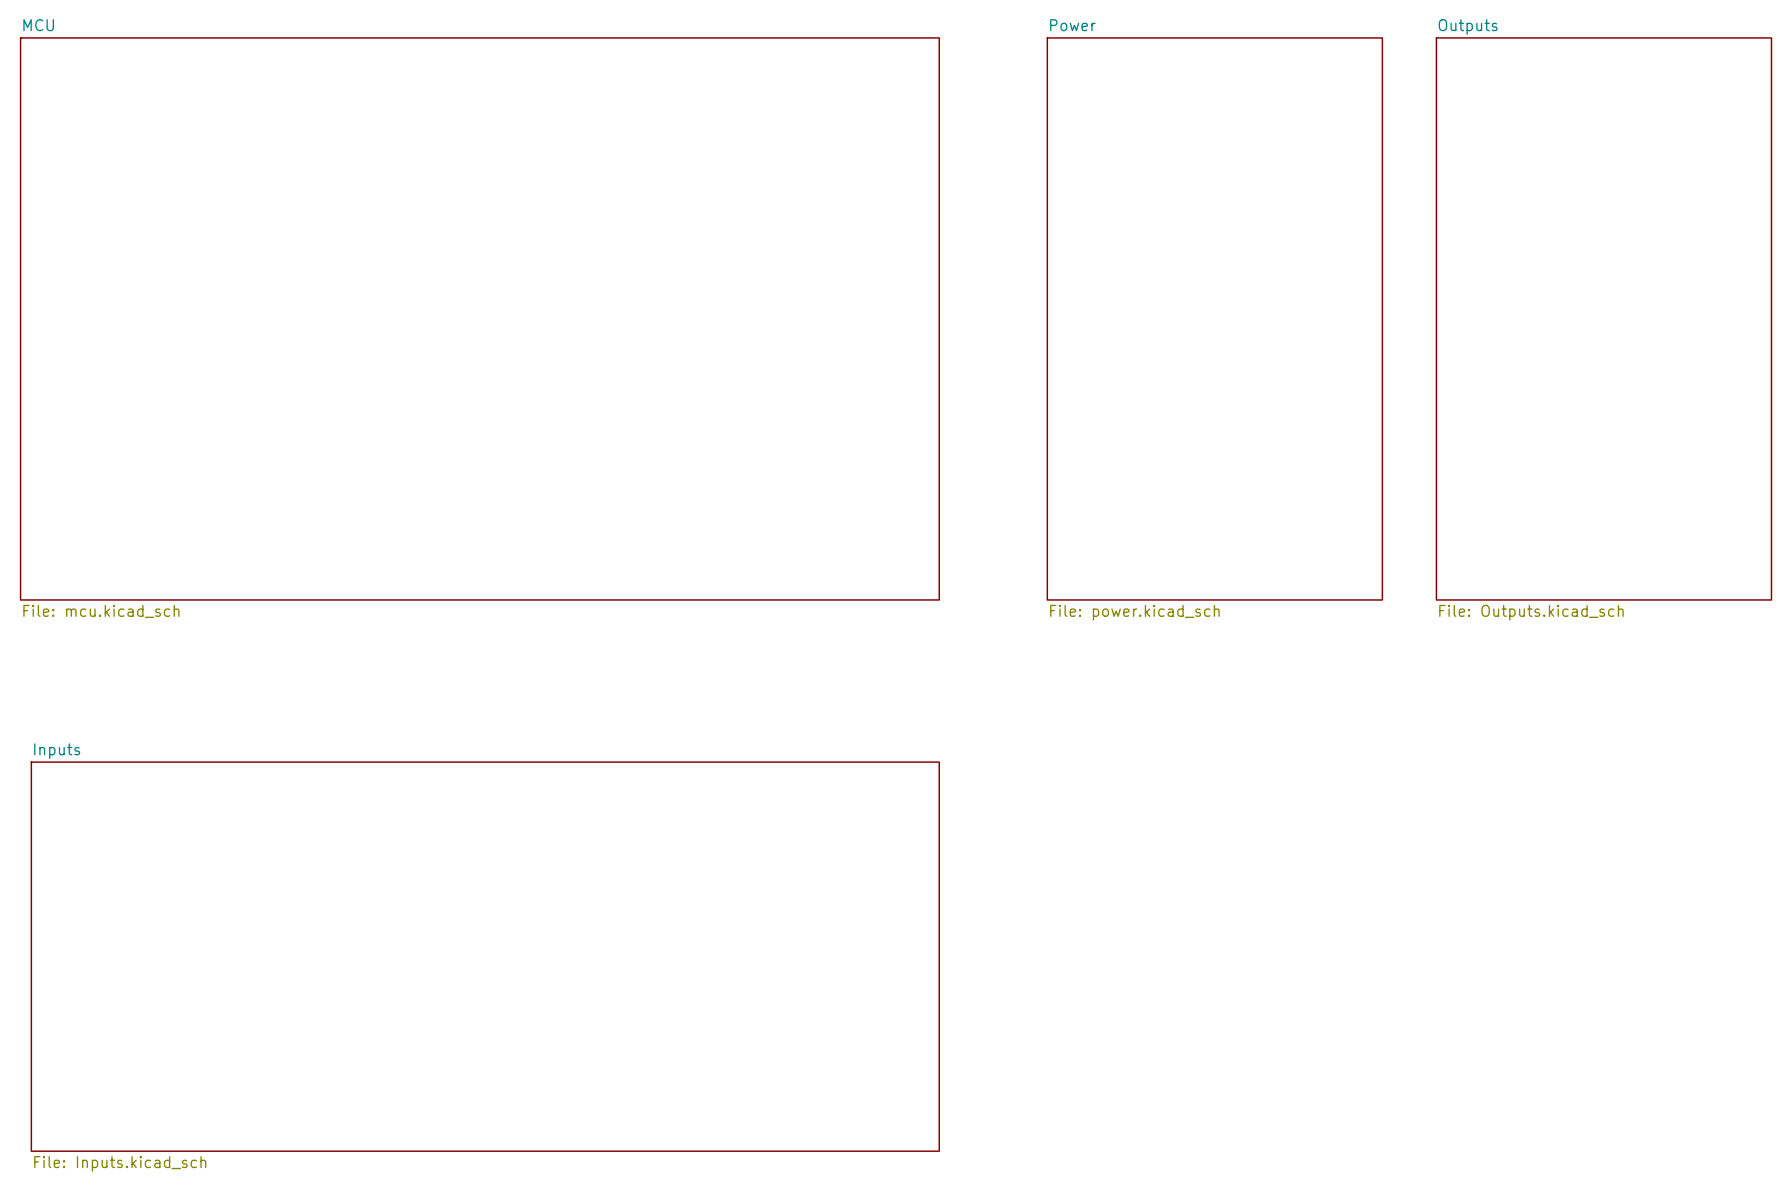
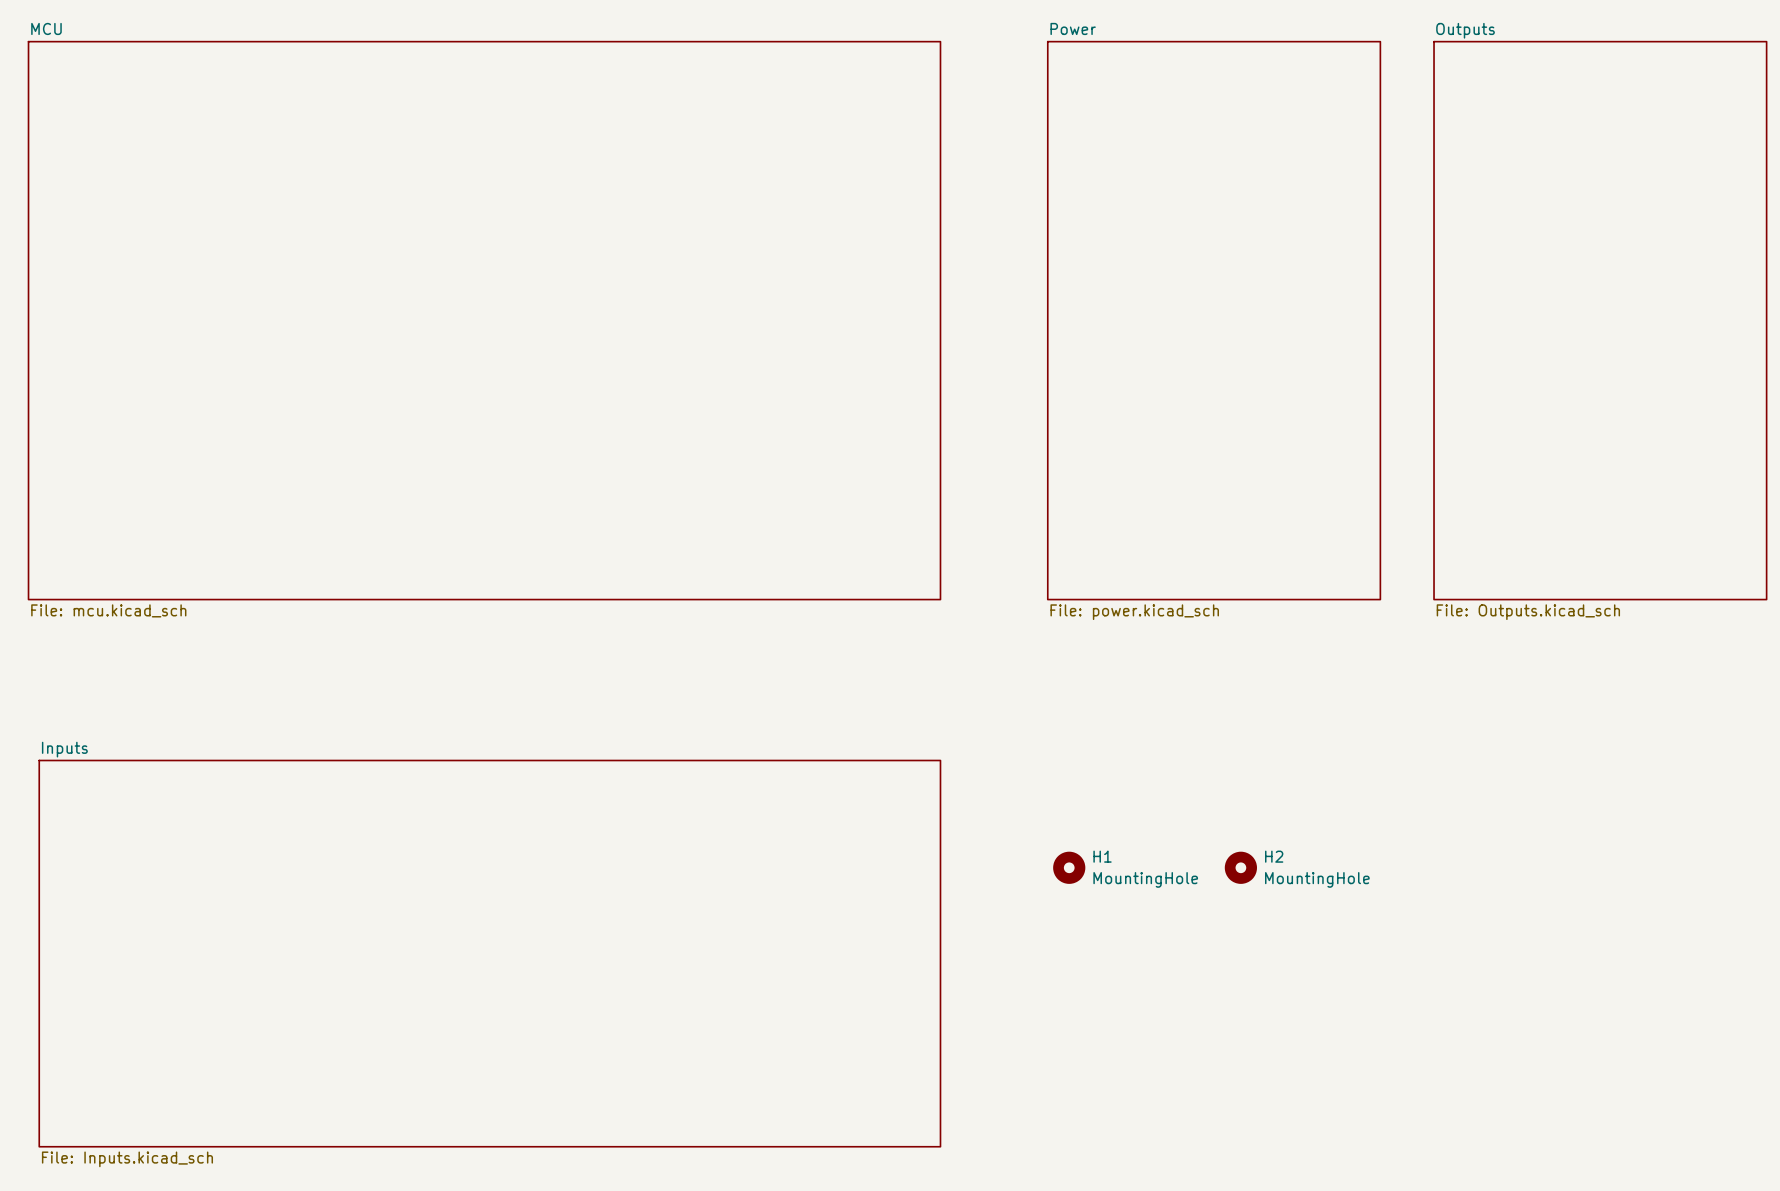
H1: none -> MountingHole (1069, 867)
H2: none -> MountingHole (1240, 867)

